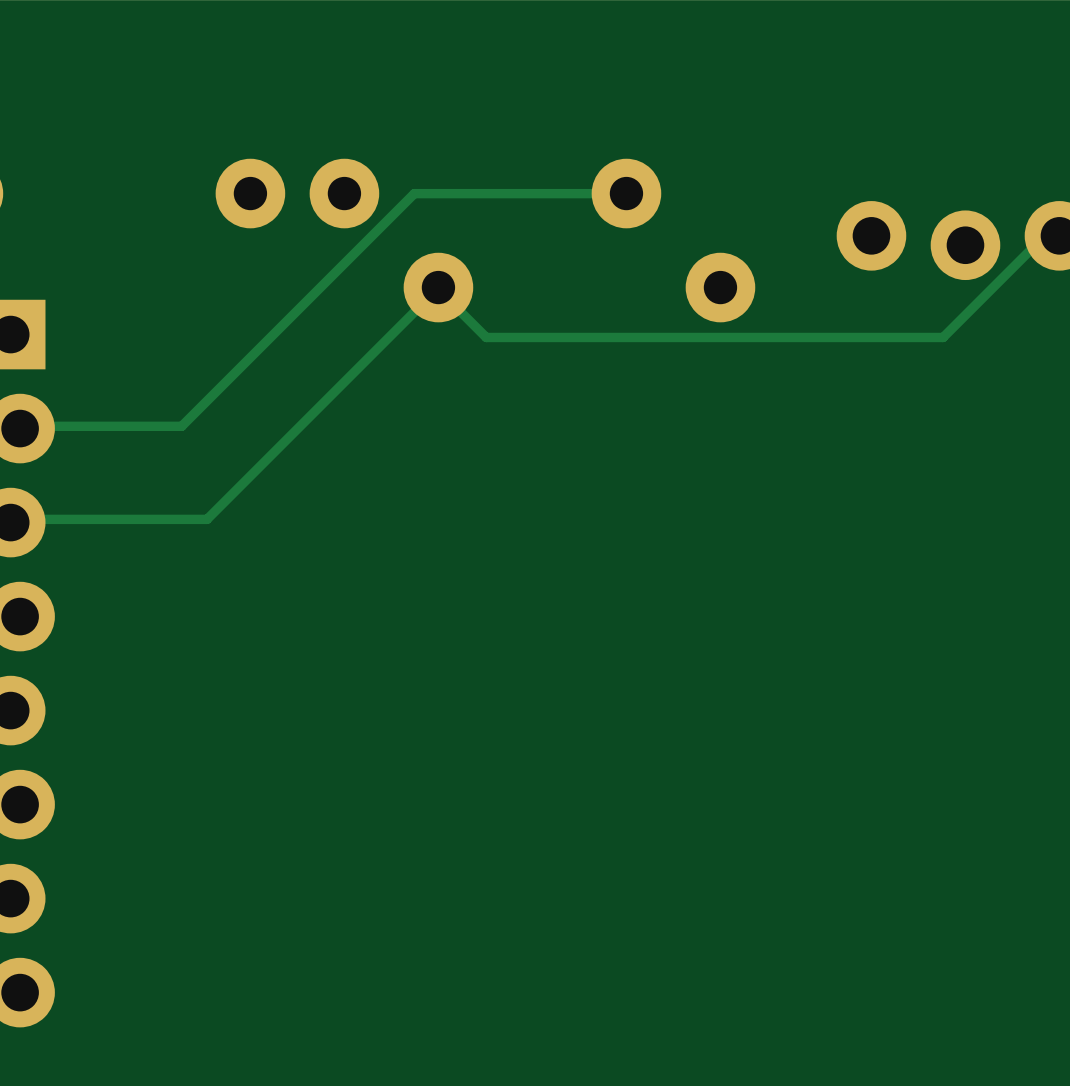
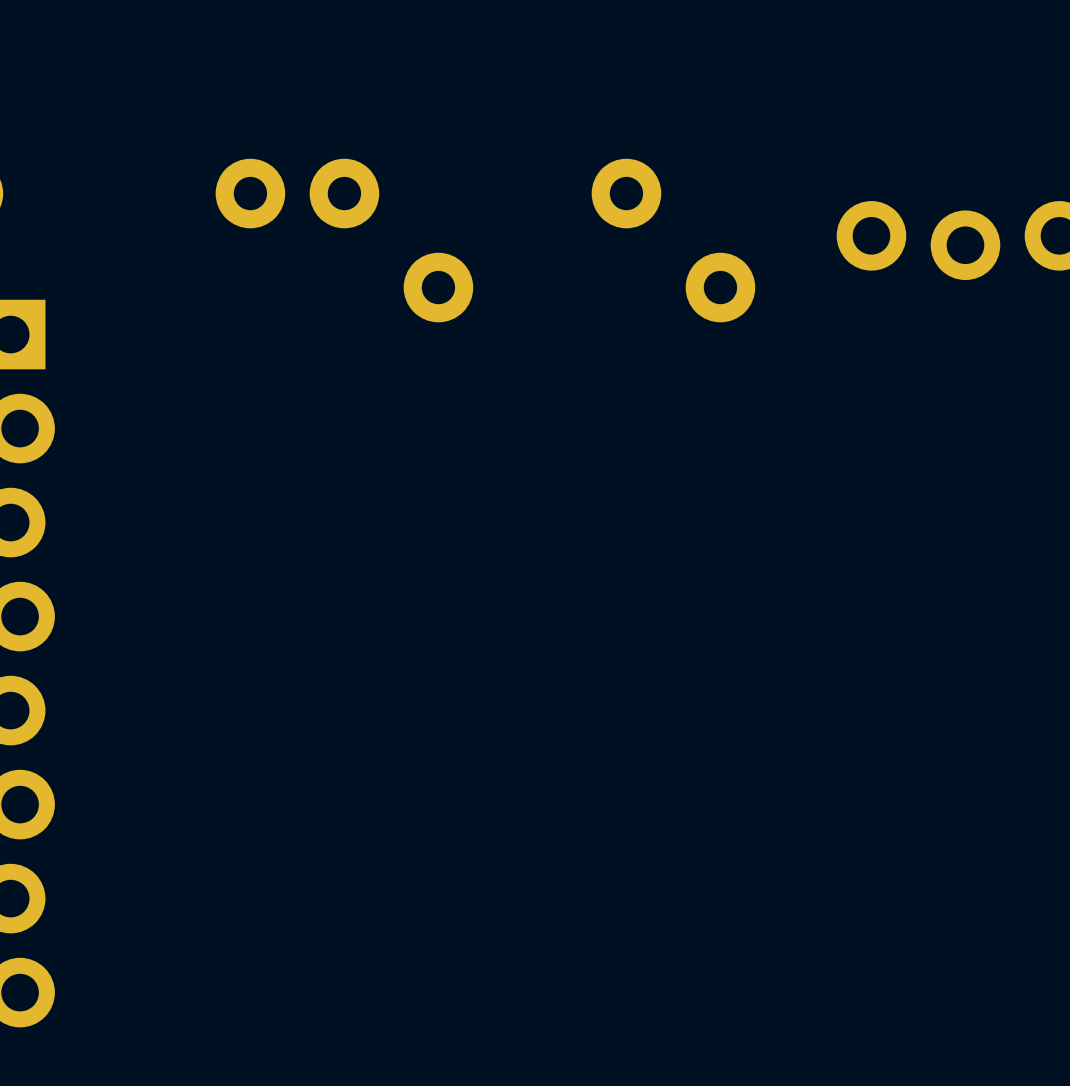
track: (625, 193) (414, 193) (181, 426) (20, 426) (20, 428) -> none
track: (1059, 235) (1044, 235) (943, 337) (486, 337) (438, 287) (207, 519) (12, 519) (10, 522) -> none

